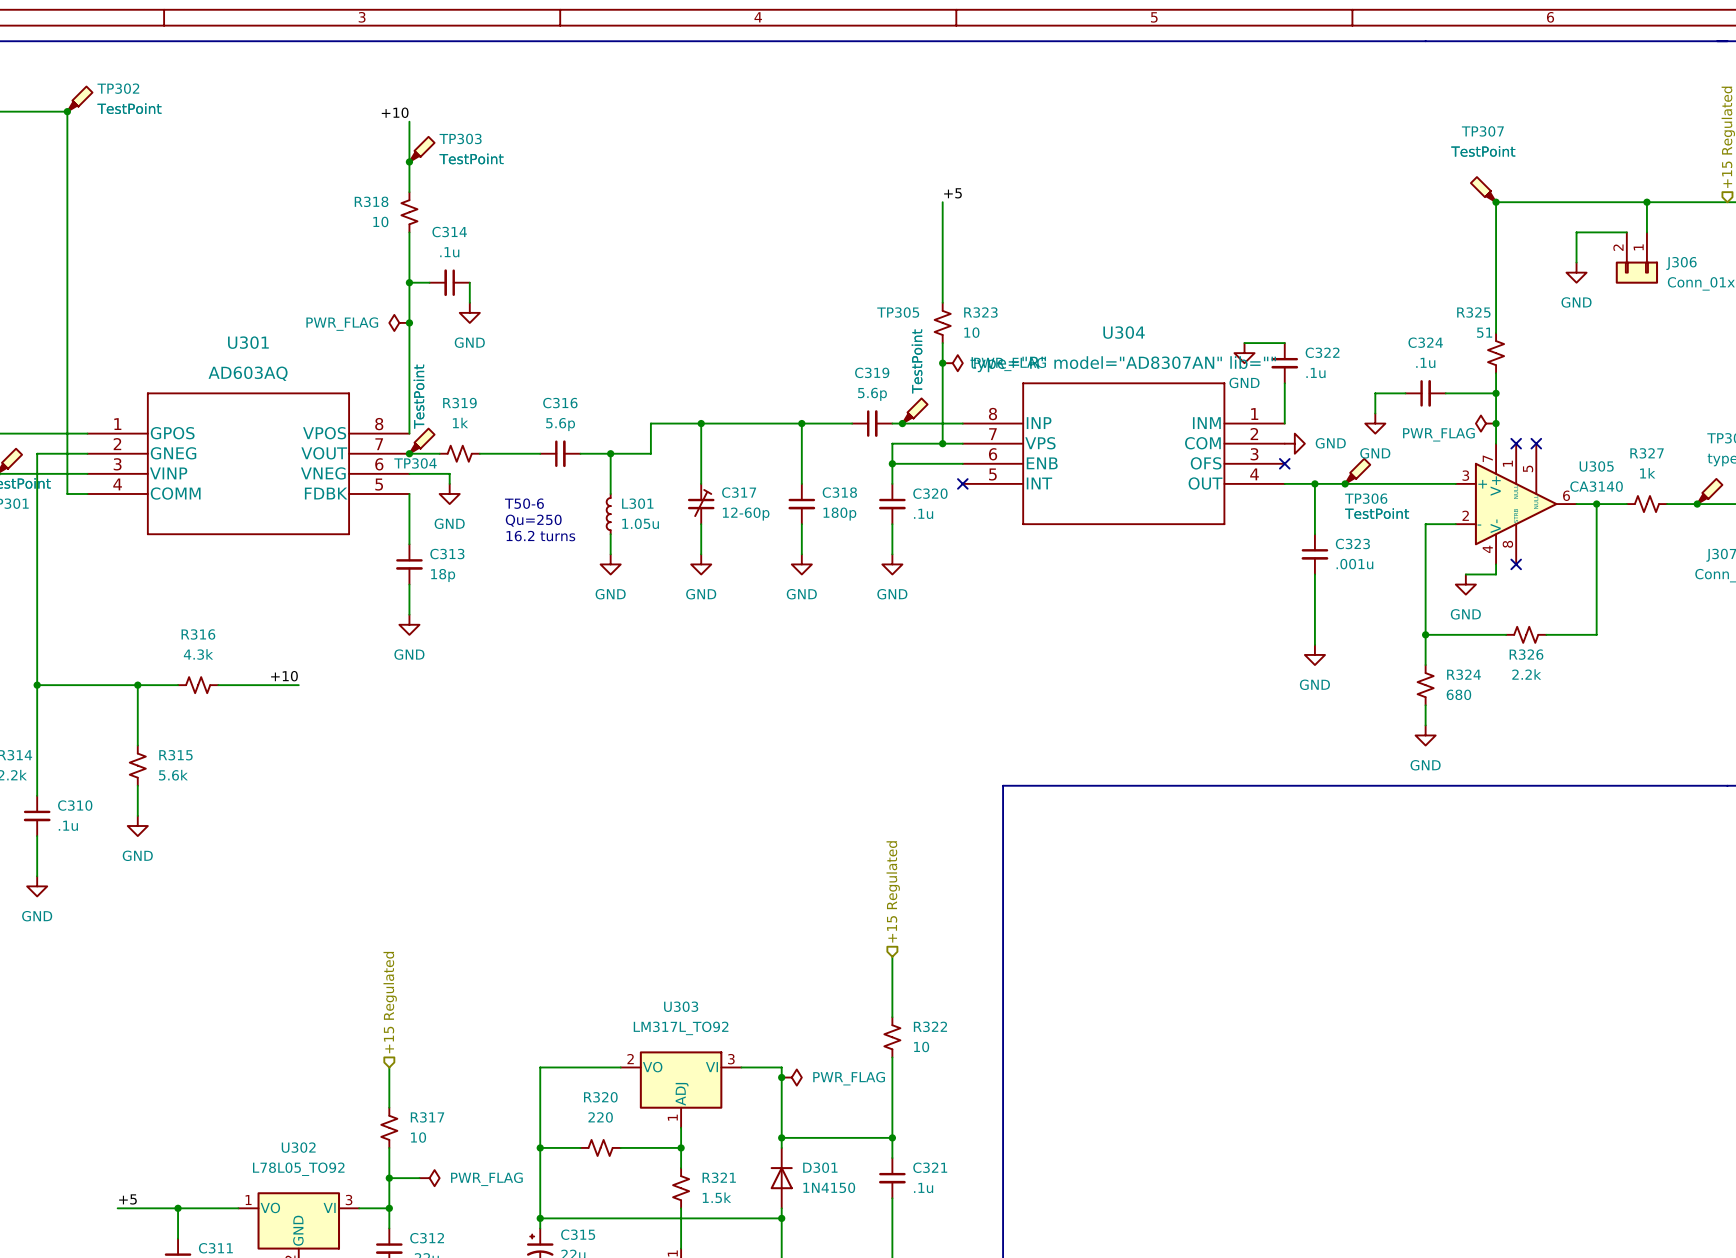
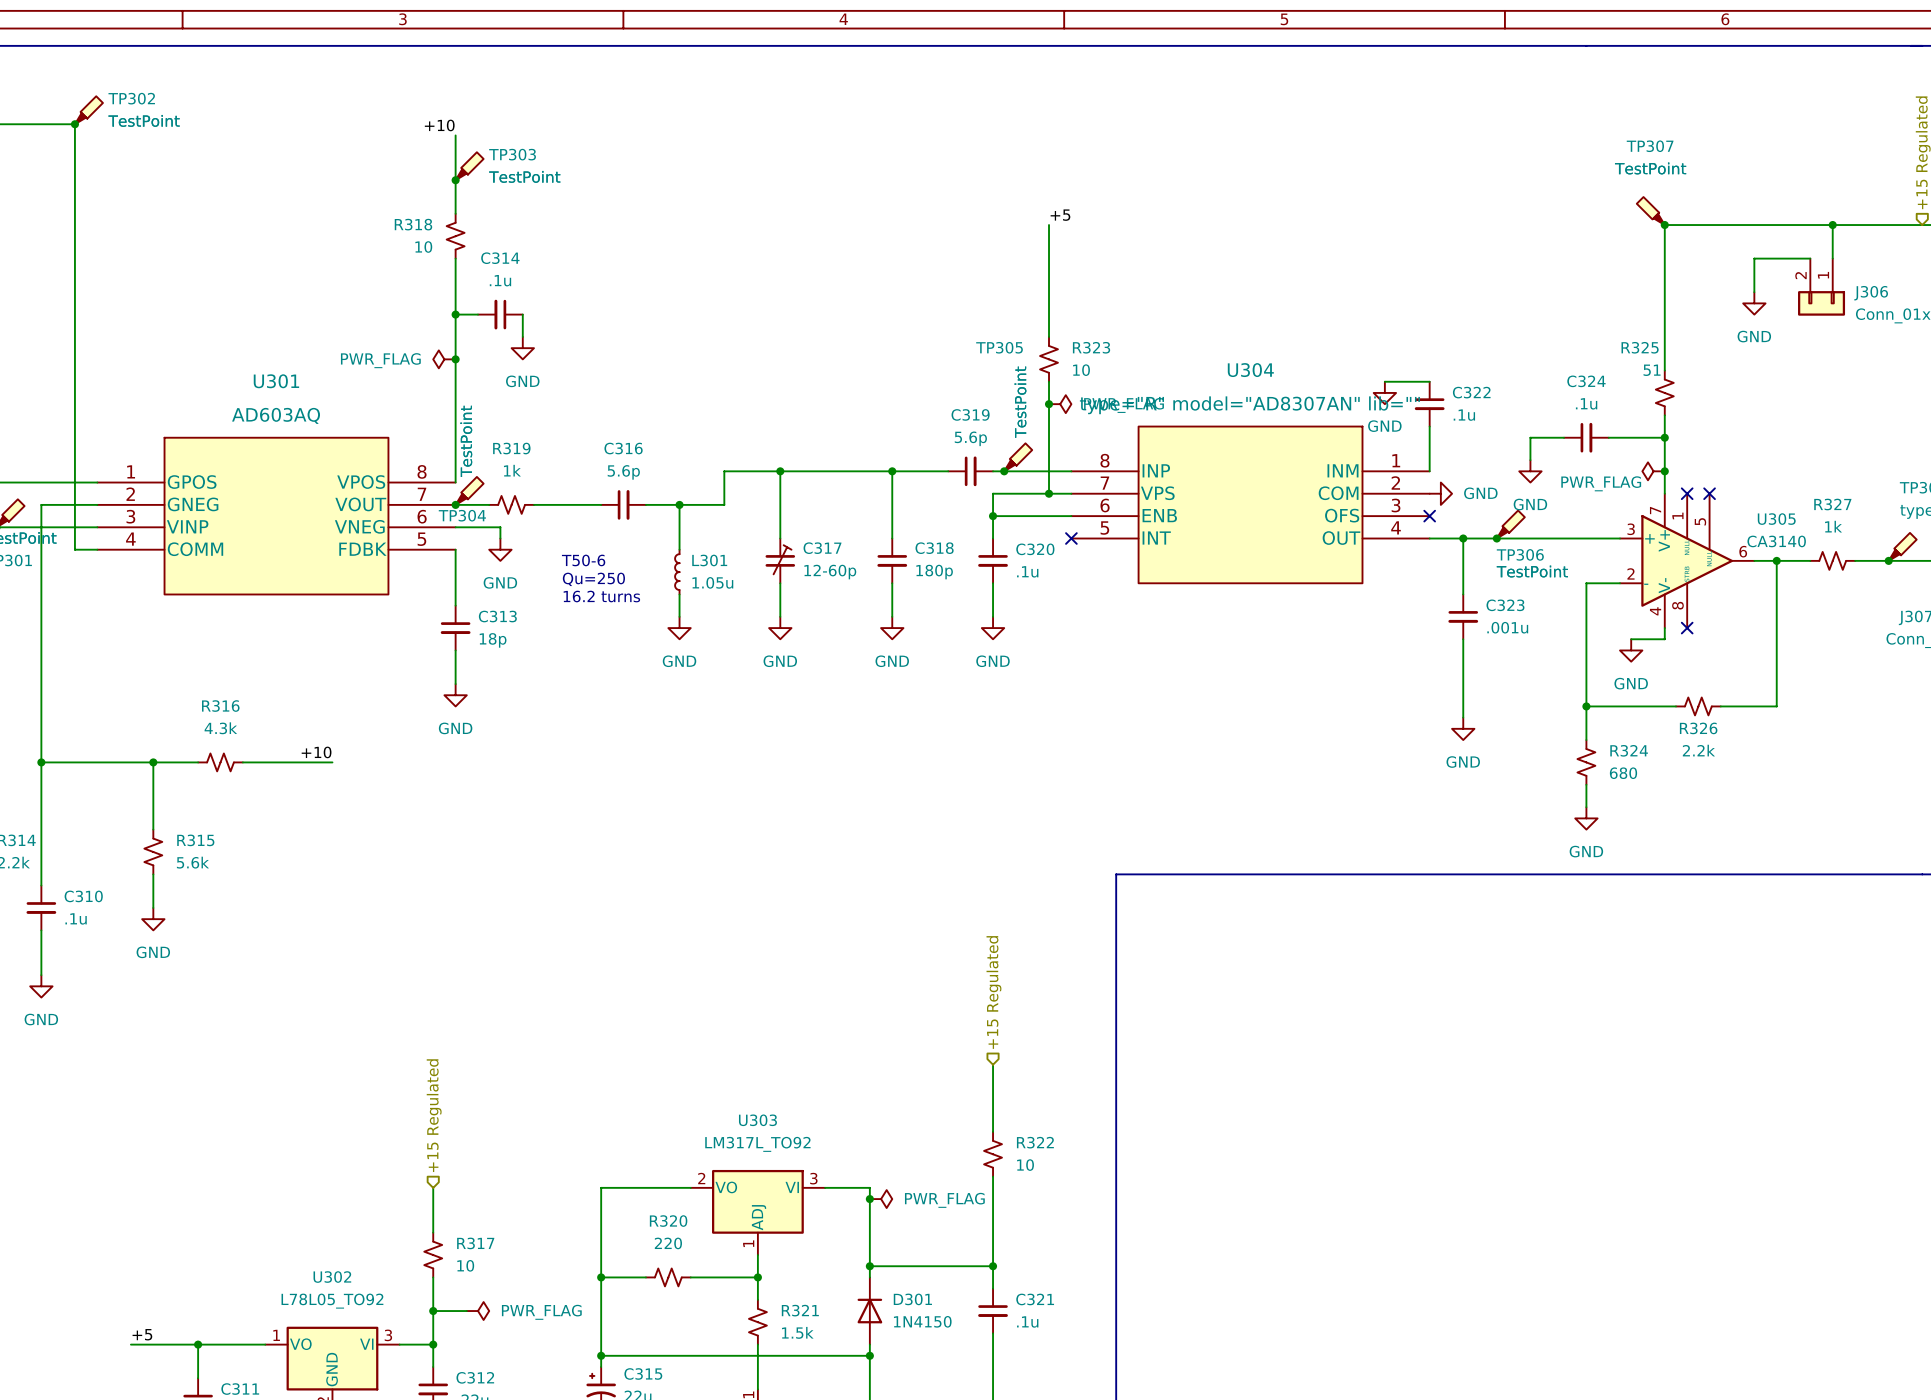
U304 symbol: [962, 382, 1285, 525] -> [1071, 426, 1430, 584]
U301 symbol: [87, 392, 410, 535] -> [97, 437, 456, 595]

